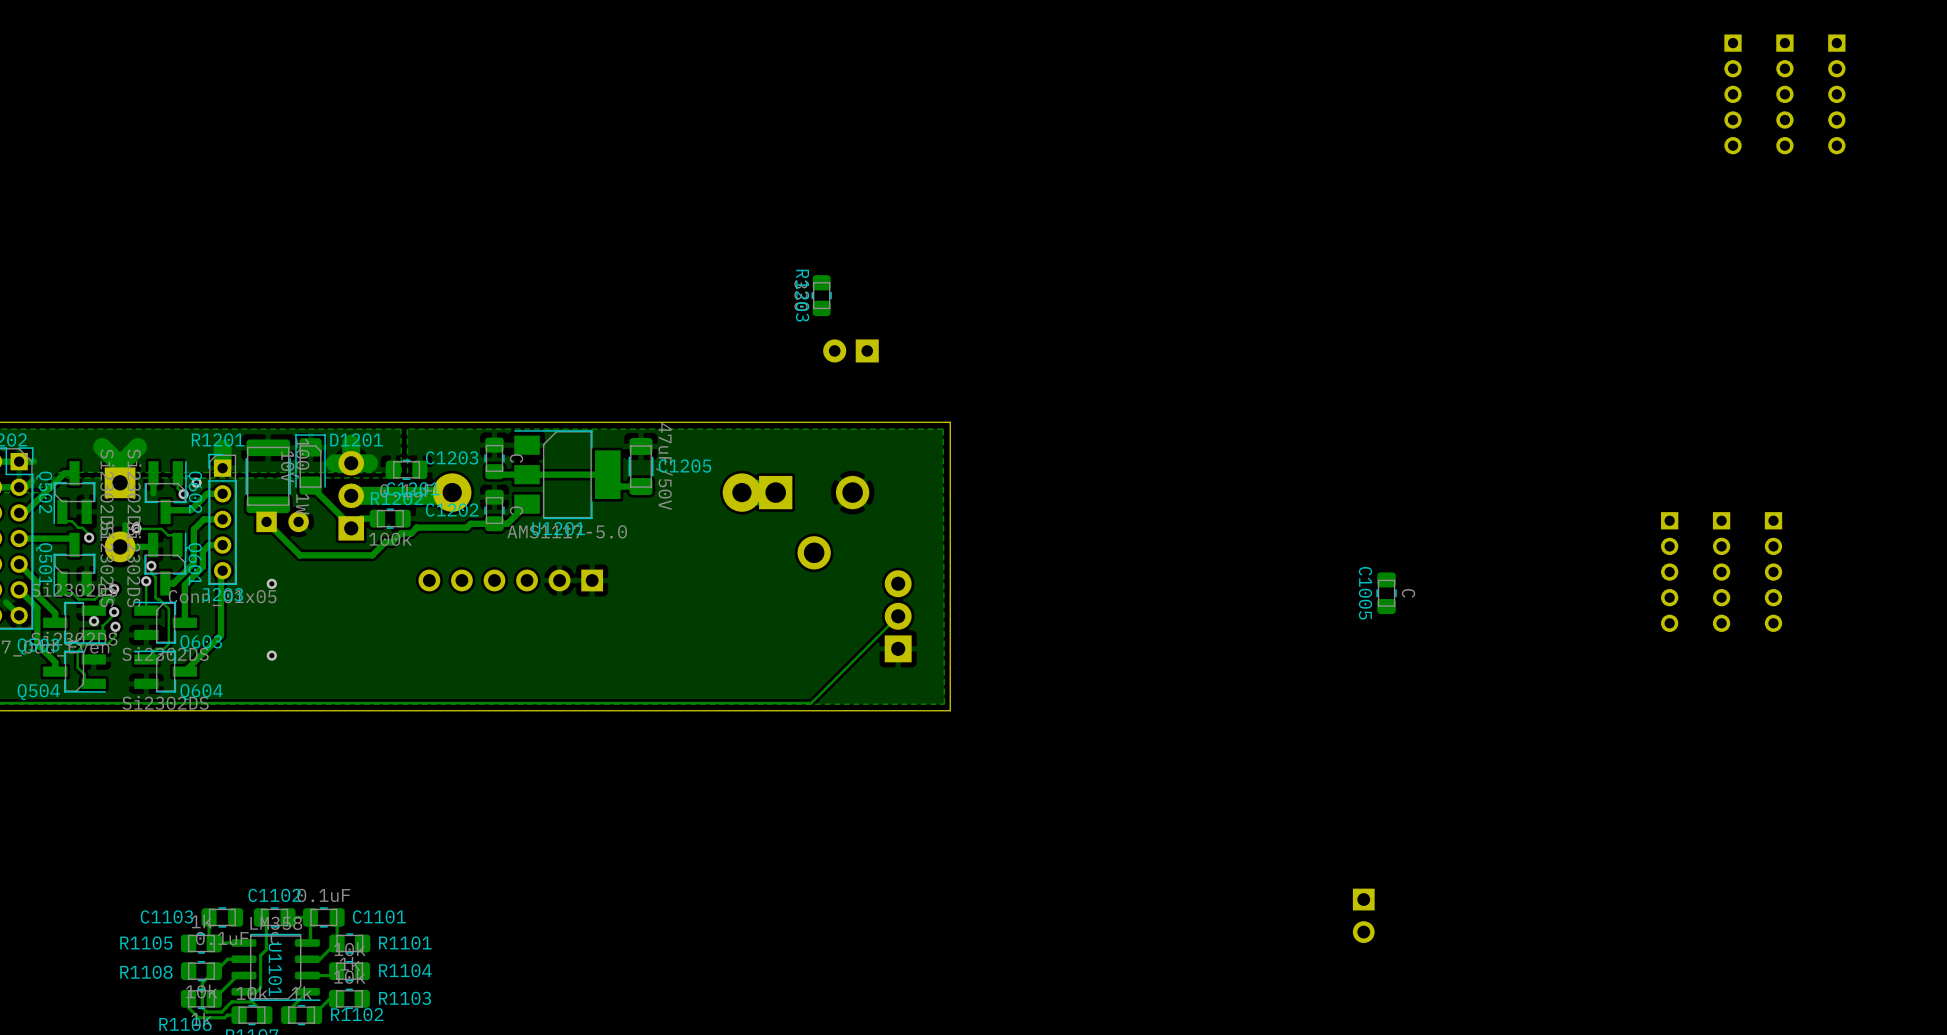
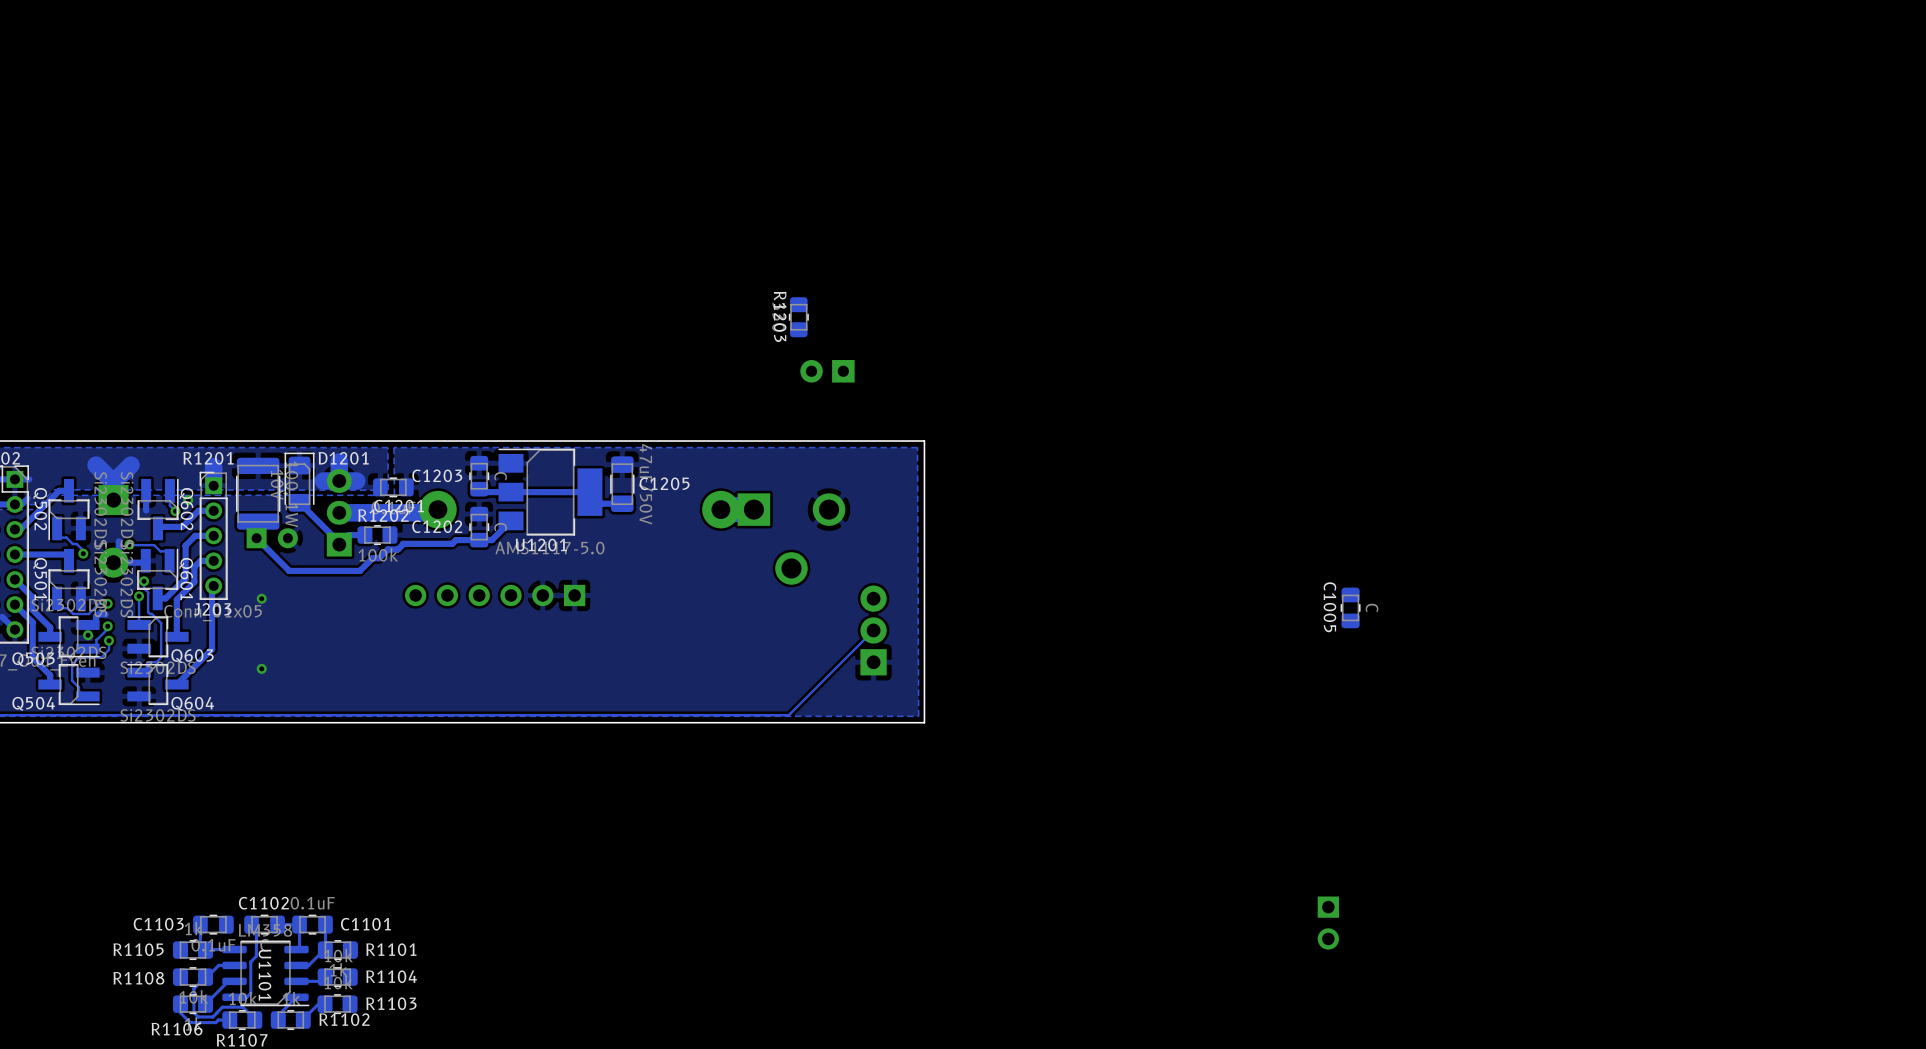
part: (1733, 94) -> none
part: (1784, 94) -> none
part: (1836, 94) -> none
part: (1669, 572) -> none
part: (1721, 572) -> none
part: (1773, 572) -> none

